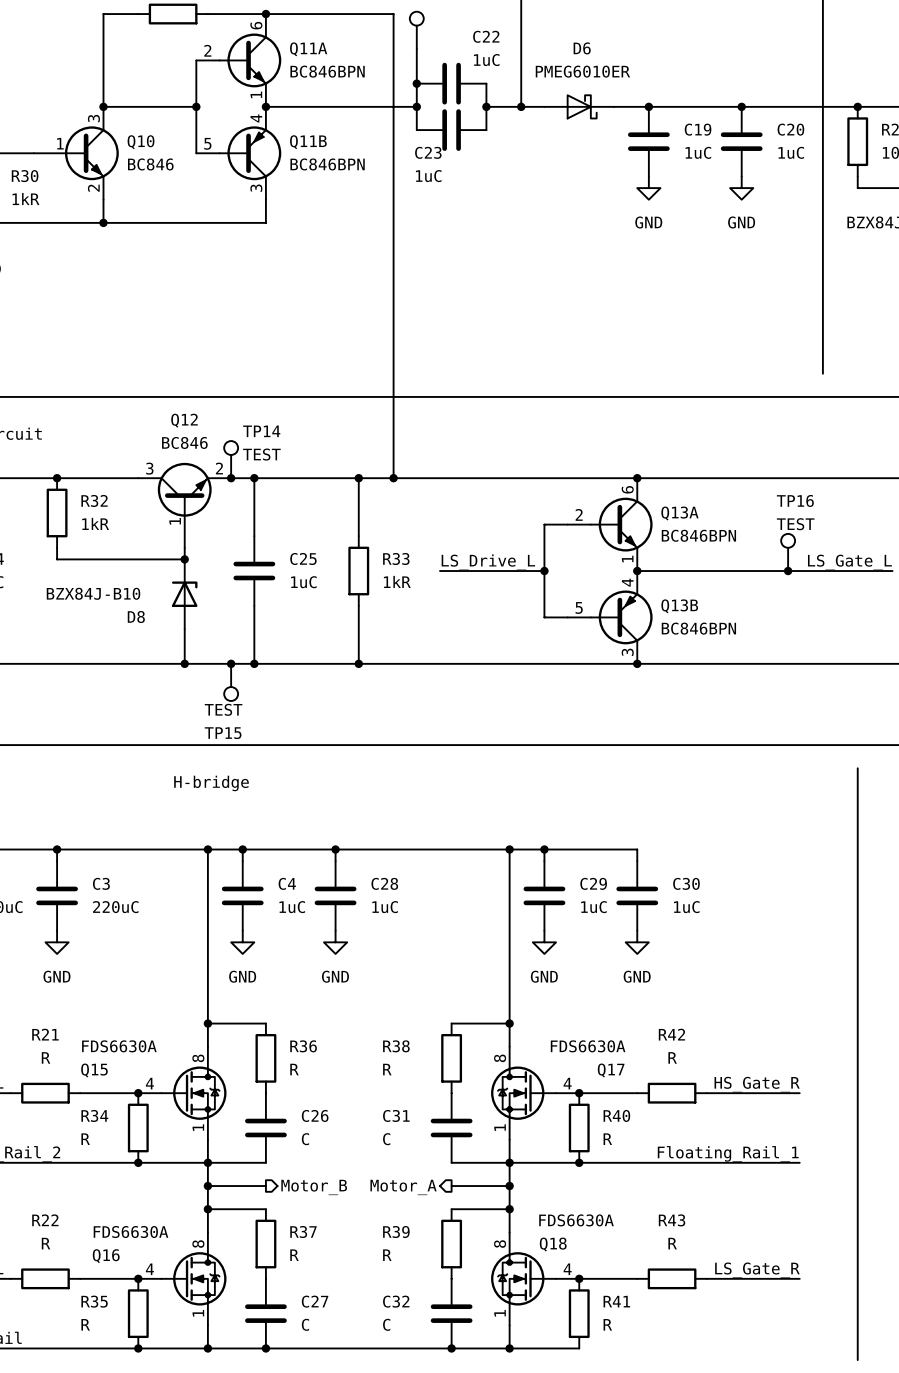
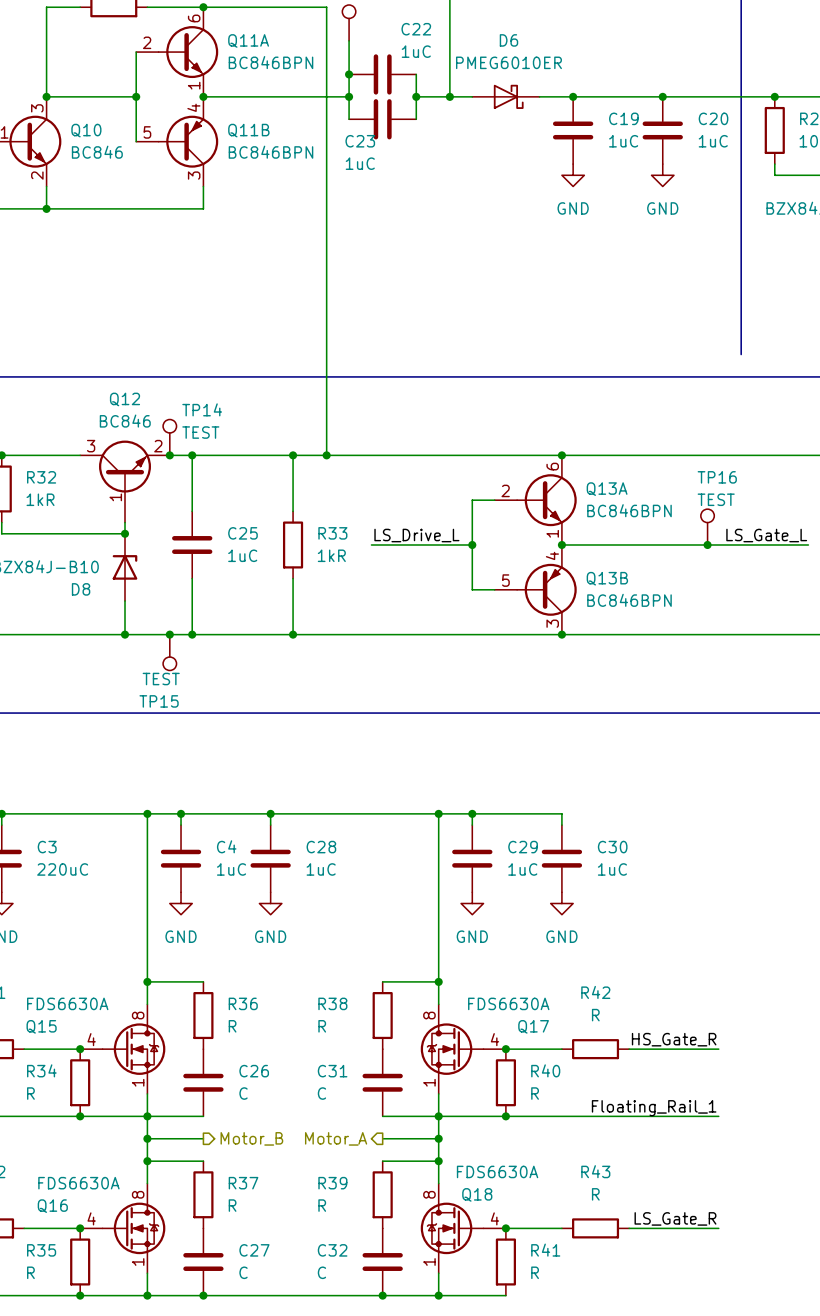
line: (857, 768) (857, 1360) -> none
text: H-bridge (211, 783) -> none

